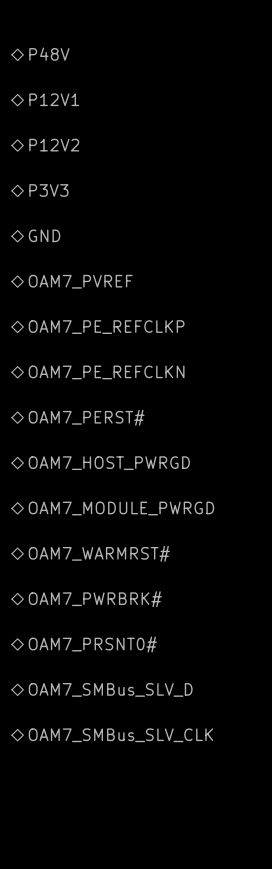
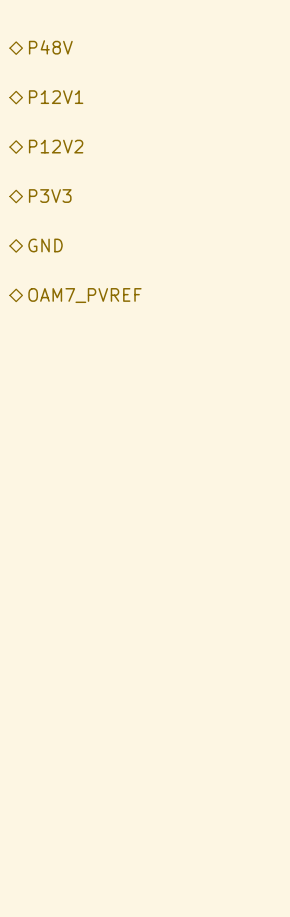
hierarchical label: OAM7_PE_REFCLKP (106, 327) -> none
hierarchical label: OAM7_PE_REFCLKN (106, 372) -> none
hierarchical label: OAM7_PERST# (86, 417) -> none
hierarchical label: OAM7_HOST_PWRGD (109, 463) -> none
hierarchical label: OAM7_MODULE_PWRGD (121, 508) -> none
hierarchical label: OAM7_WARMRST# (99, 553) -> none
hierarchical label: OAM7_PWRBRK# (95, 599) -> none
hierarchical label: OAM7_PRSNT0# (92, 644) -> none
hierarchical label: OAM7_SMBus_SLV_D (110, 689) -> none
hierarchical label: OAM7_SMBus_SLV_CLK (120, 735) -> none

